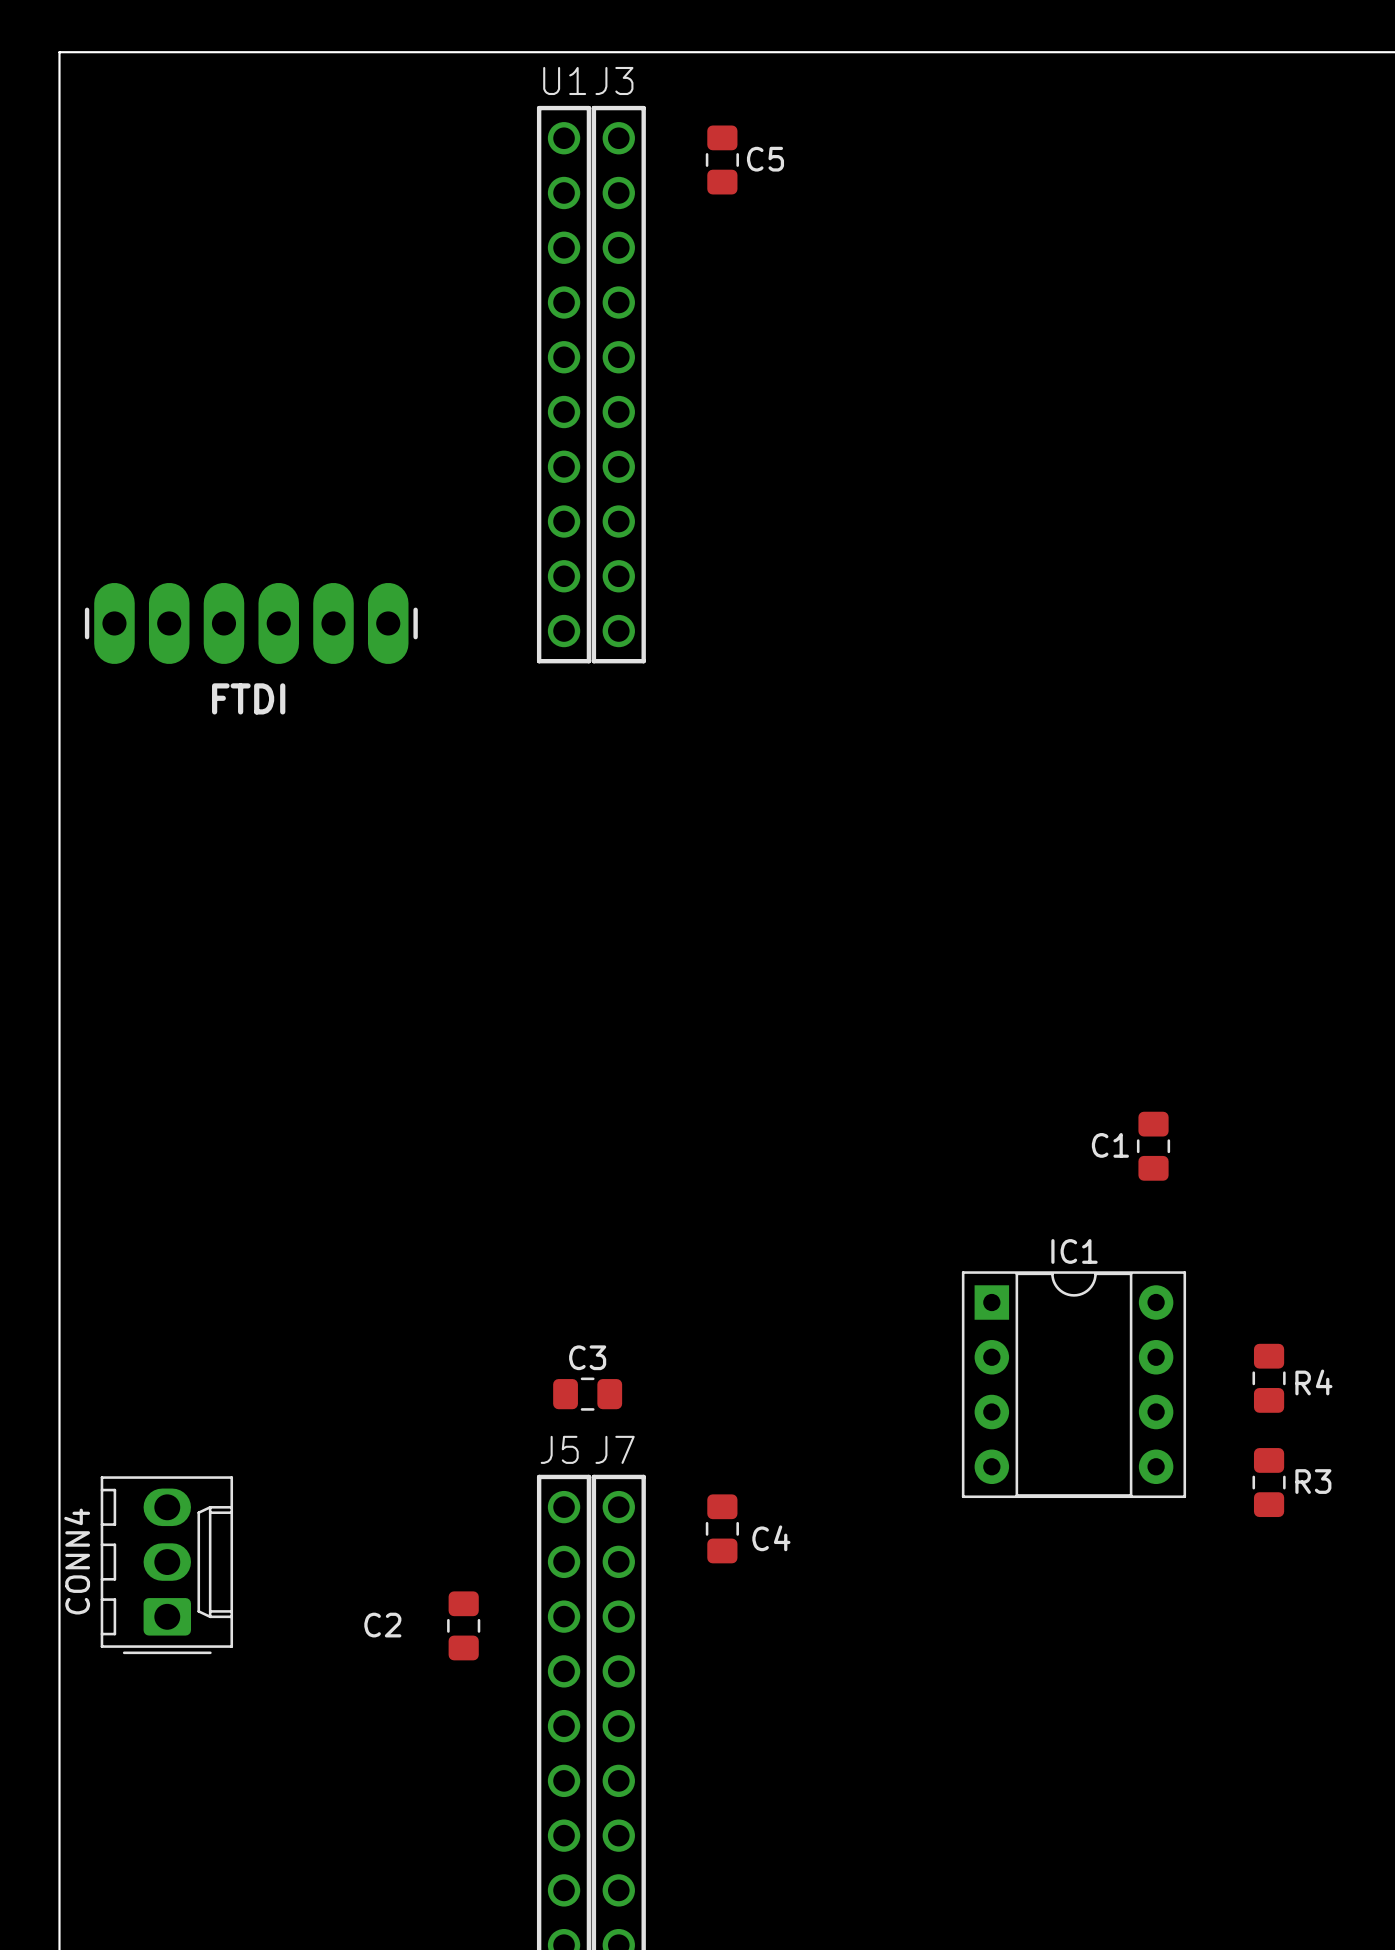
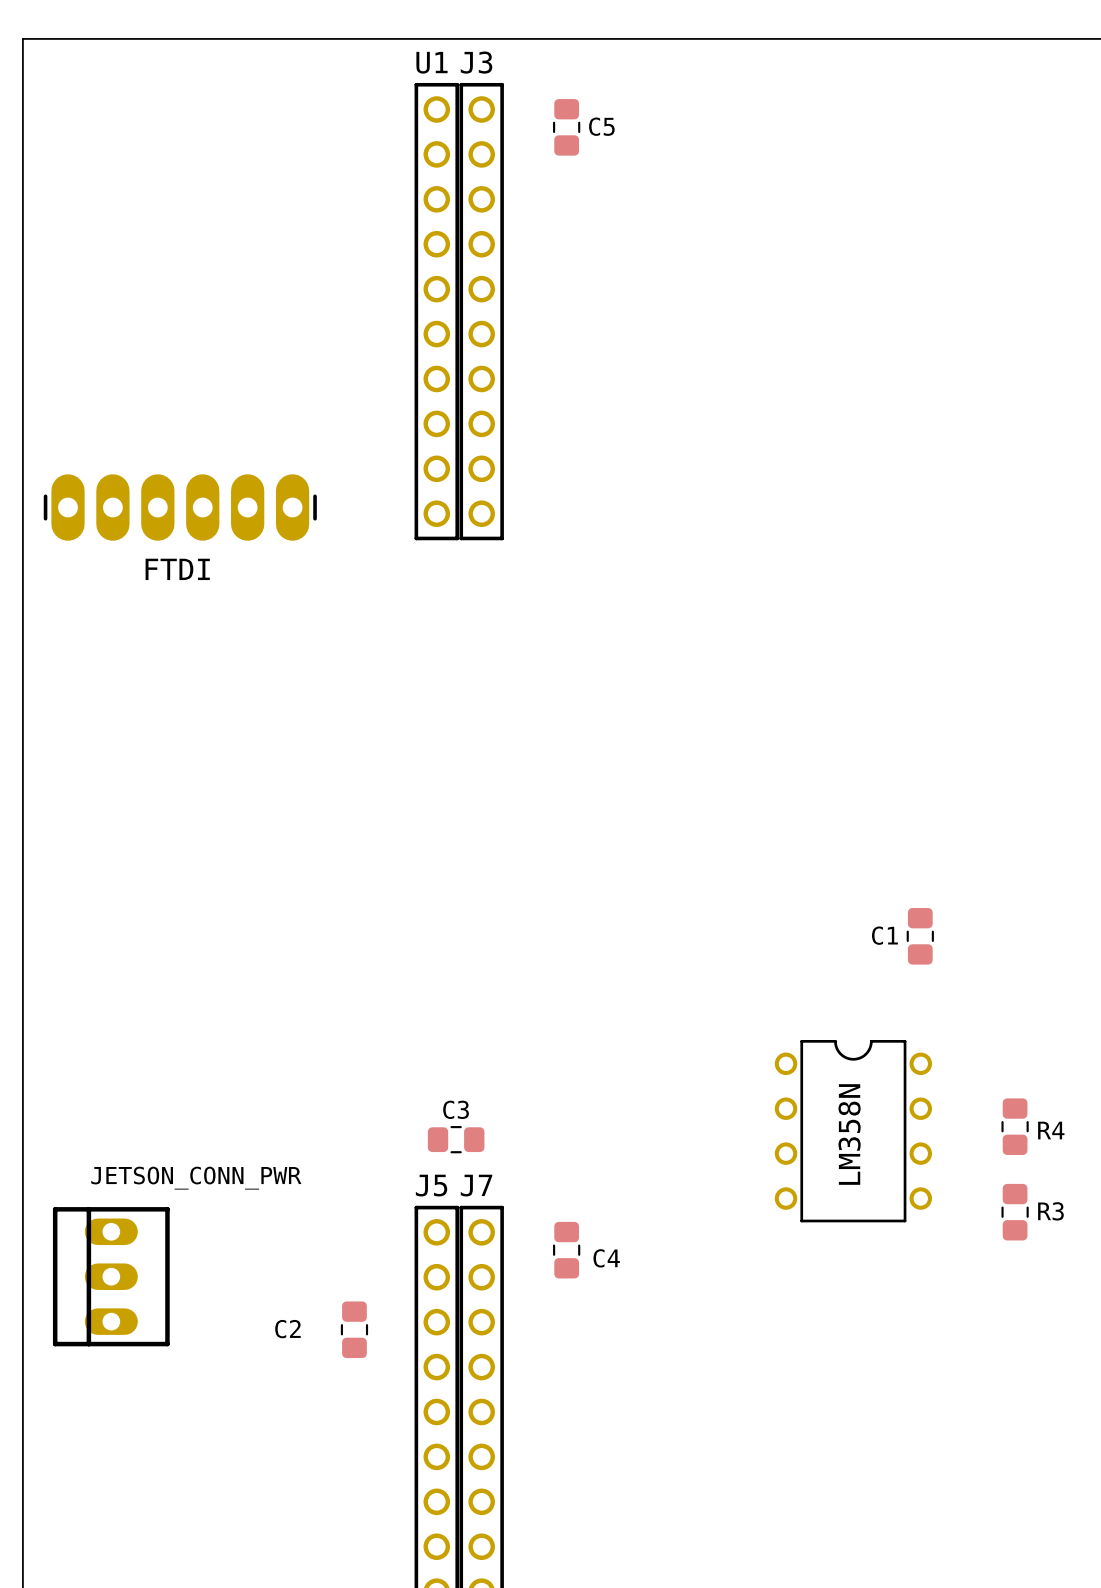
part: none -> LM358N (853, 1131)
IC1: (1073, 1384) -> none
part: none -> JETSON_CONN_PWR (111, 1276)
CONN4: (166, 1565) -> none

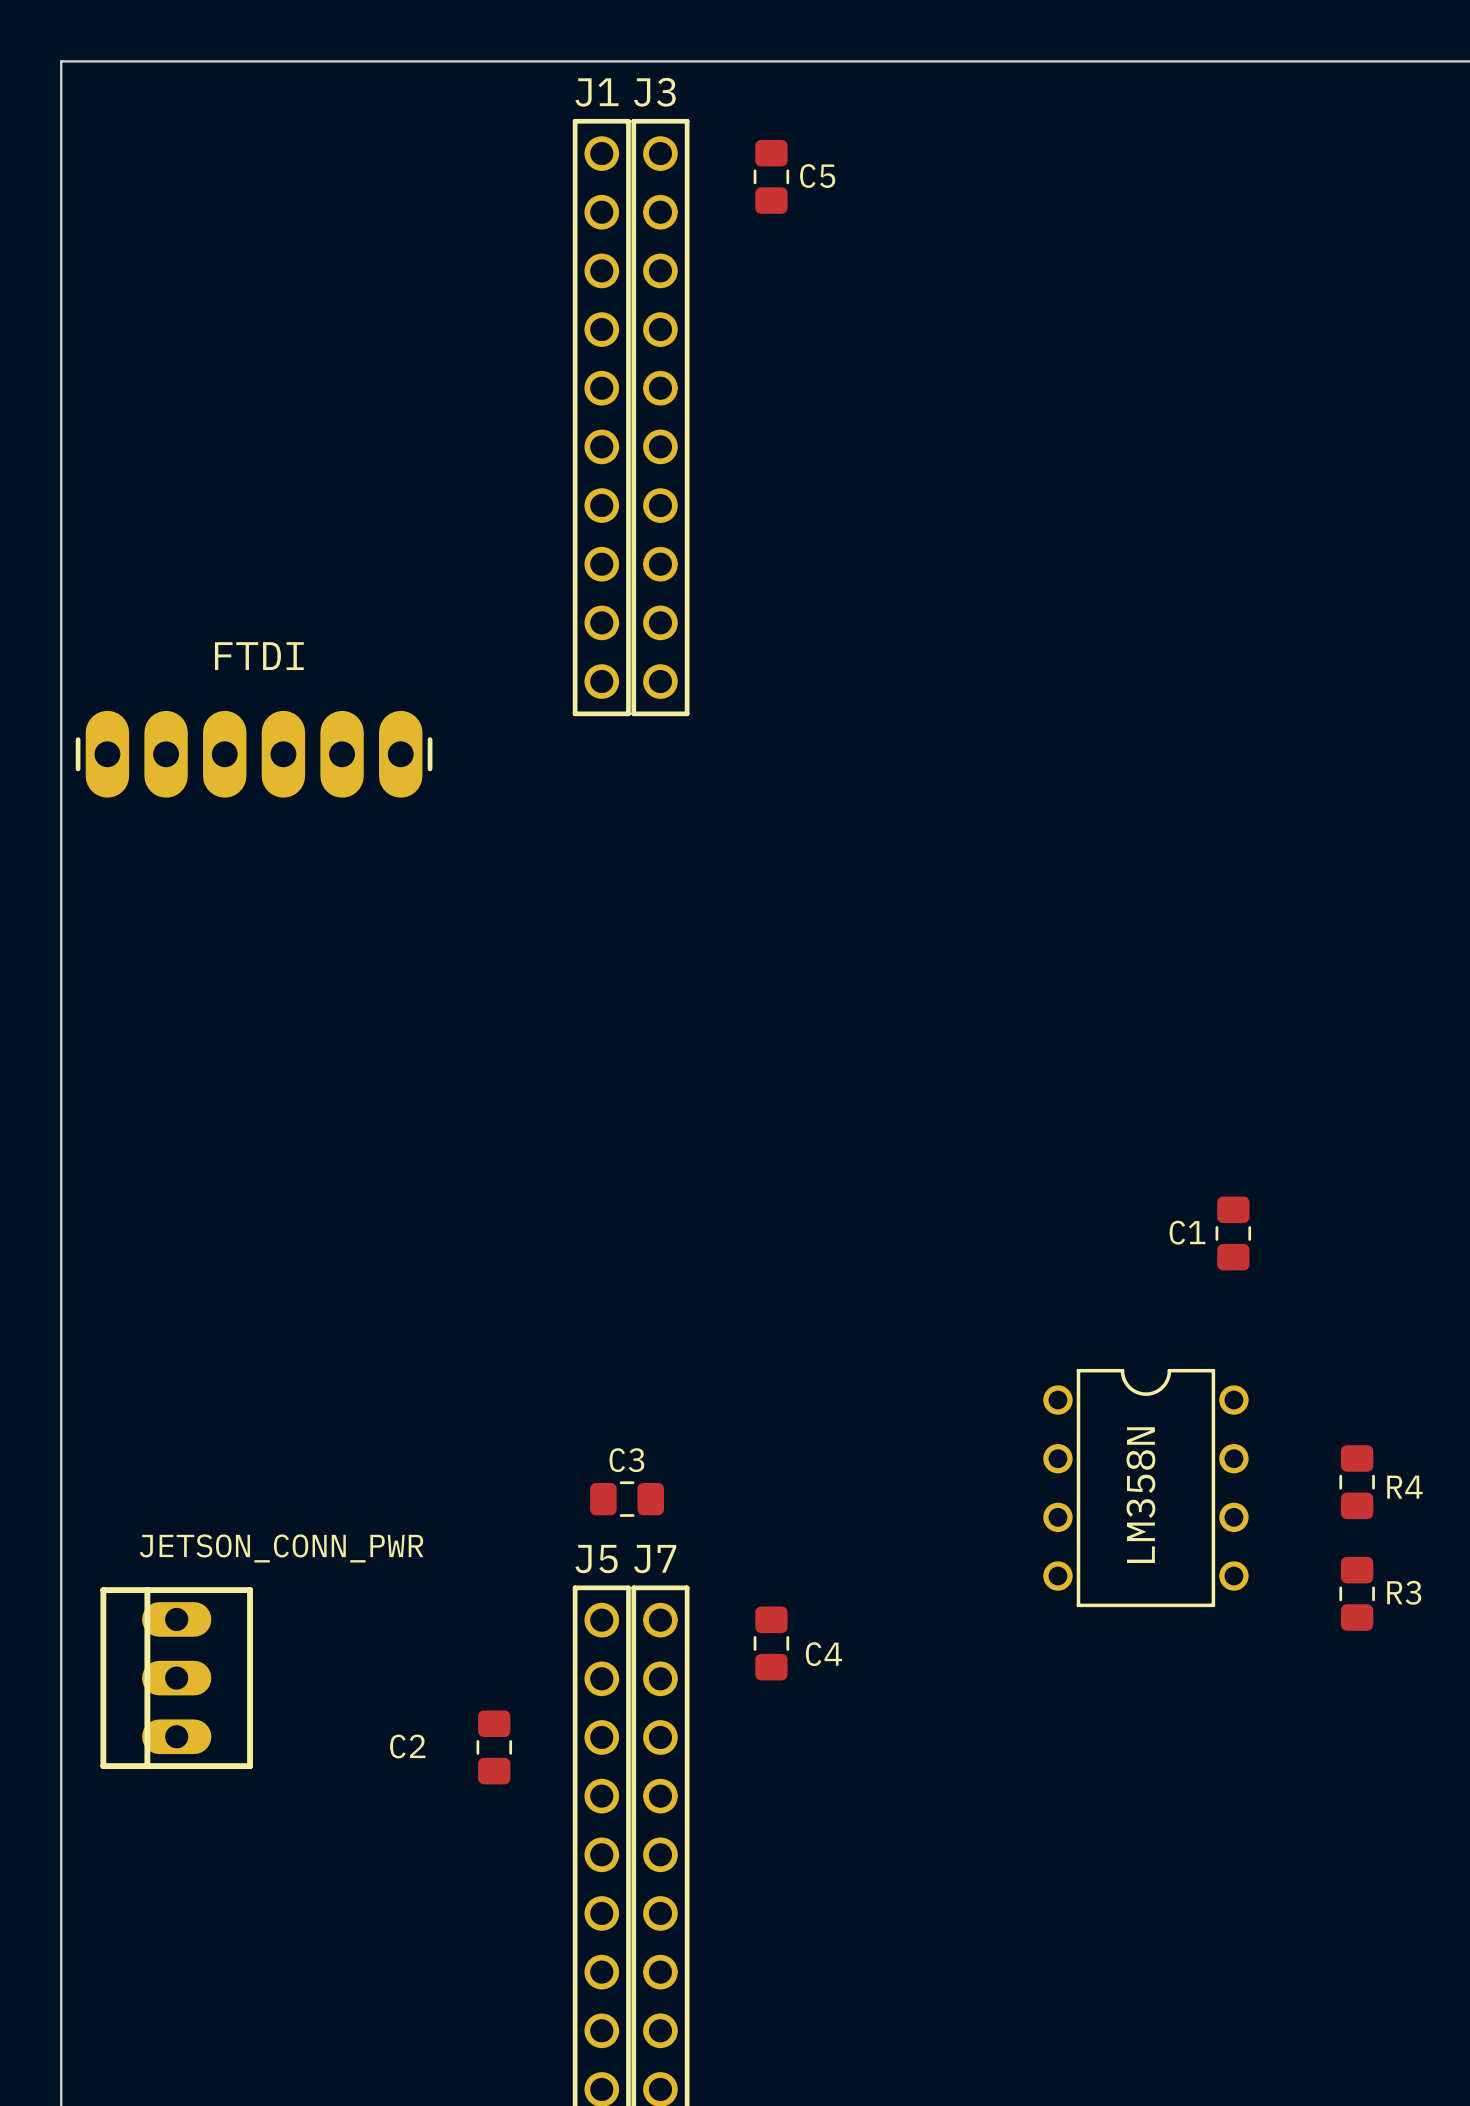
U1 name: U1 (431, 62) -> J1 (596, 92)
part position: (180, 507) -> (254, 754)
part value position: FTDI (177, 569) -> FTDI (259, 656)

